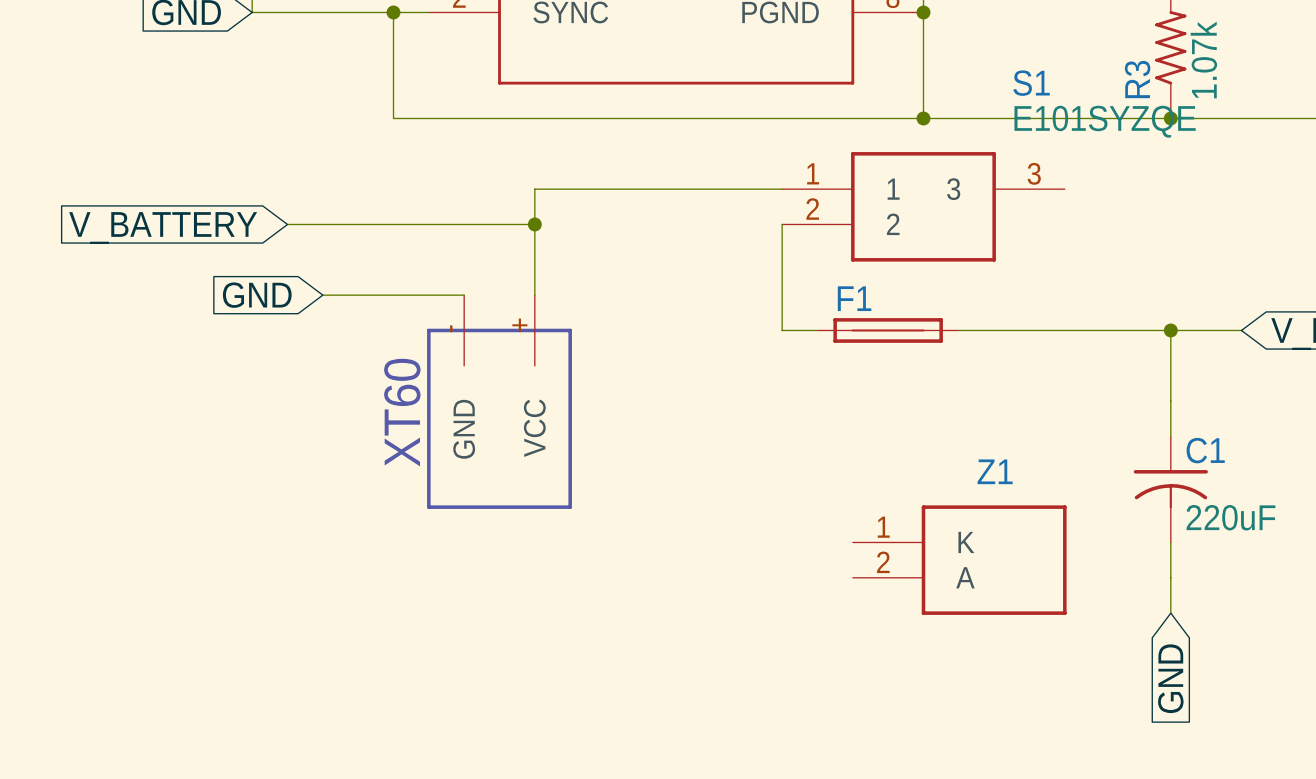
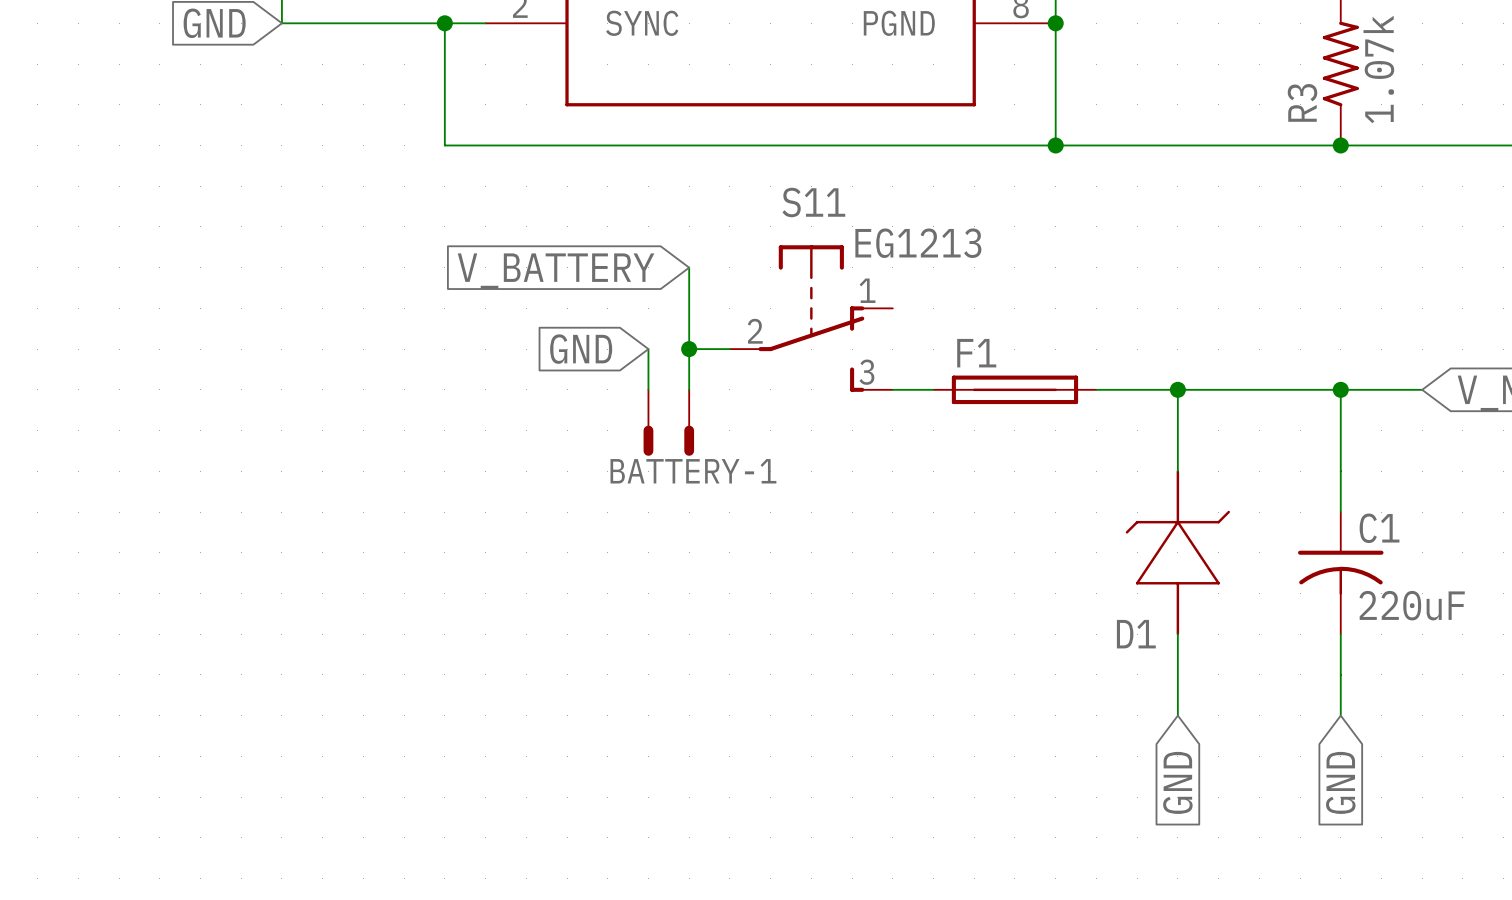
wire: (782, 189) (534, 189) (534, 295) -> none
S1: E101SYZQE (923, 206) -> none
wire: (287, 224) (534, 224) -> none
junction: (534, 224) -> none
wire: (782, 224) (782, 330) -> (689, 267) (689, 389)
global label position: V_BATTERY (163, 228) -> V_BATTERY (556, 271)
S11: none -> EG1213 (811, 318)
global label position: GND (257, 295) -> GND (581, 349)
wire: (322, 295) (464, 295) -> none
wire: none -> (648, 349) (648, 389)
wire: none -> (689, 349) (729, 349)
junction: none -> (689, 349)
wire: none -> (1177, 389) (1177, 471)
junction: none -> (1177, 389)
part: none -> (648, 422)
BATTERY-1: none -> (689, 422)
part: (499, 402) -> none
D1: none -> (1177, 552)
wire: none -> (1177, 634) (1177, 715)
Z1: (959, 560) -> none
global label: none -> GND (1177, 782)

